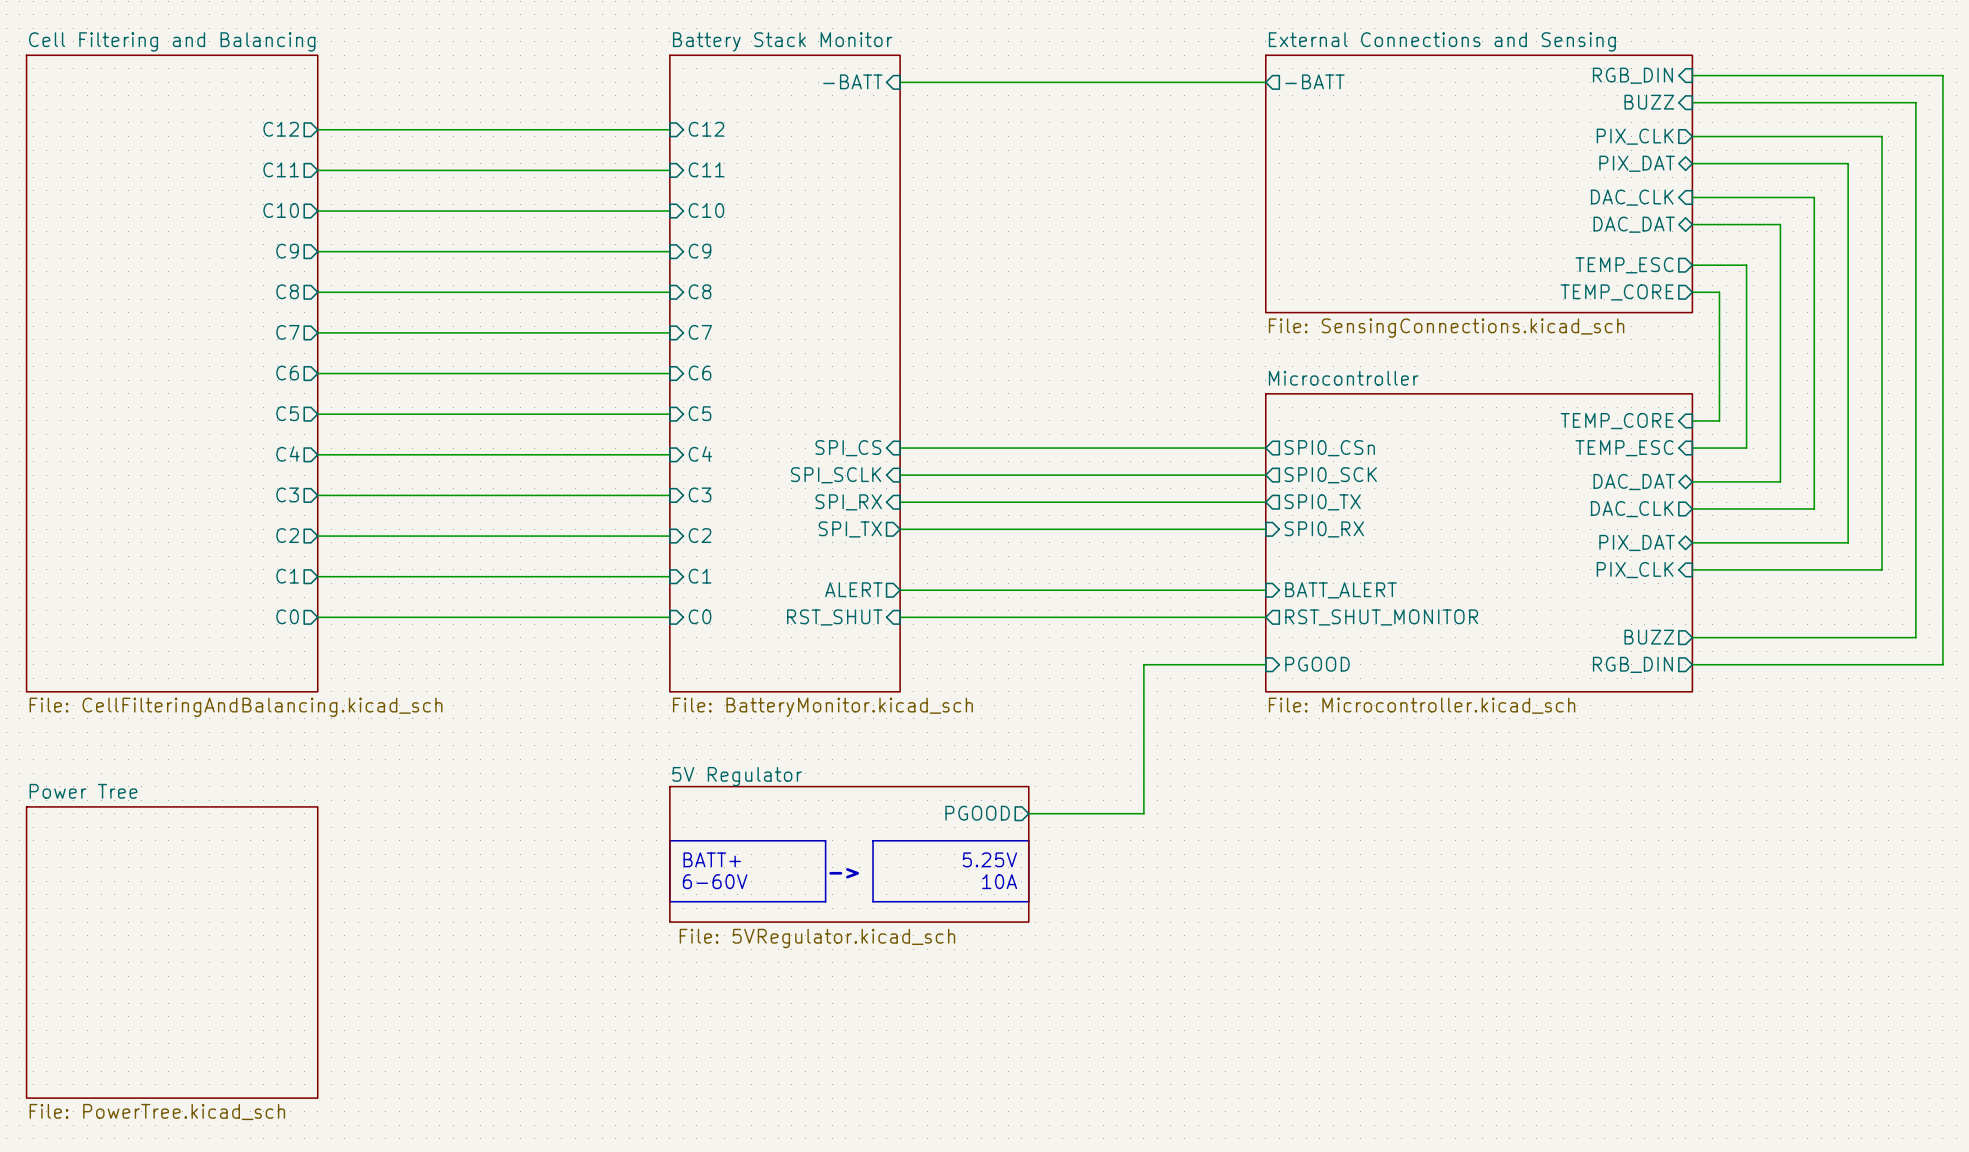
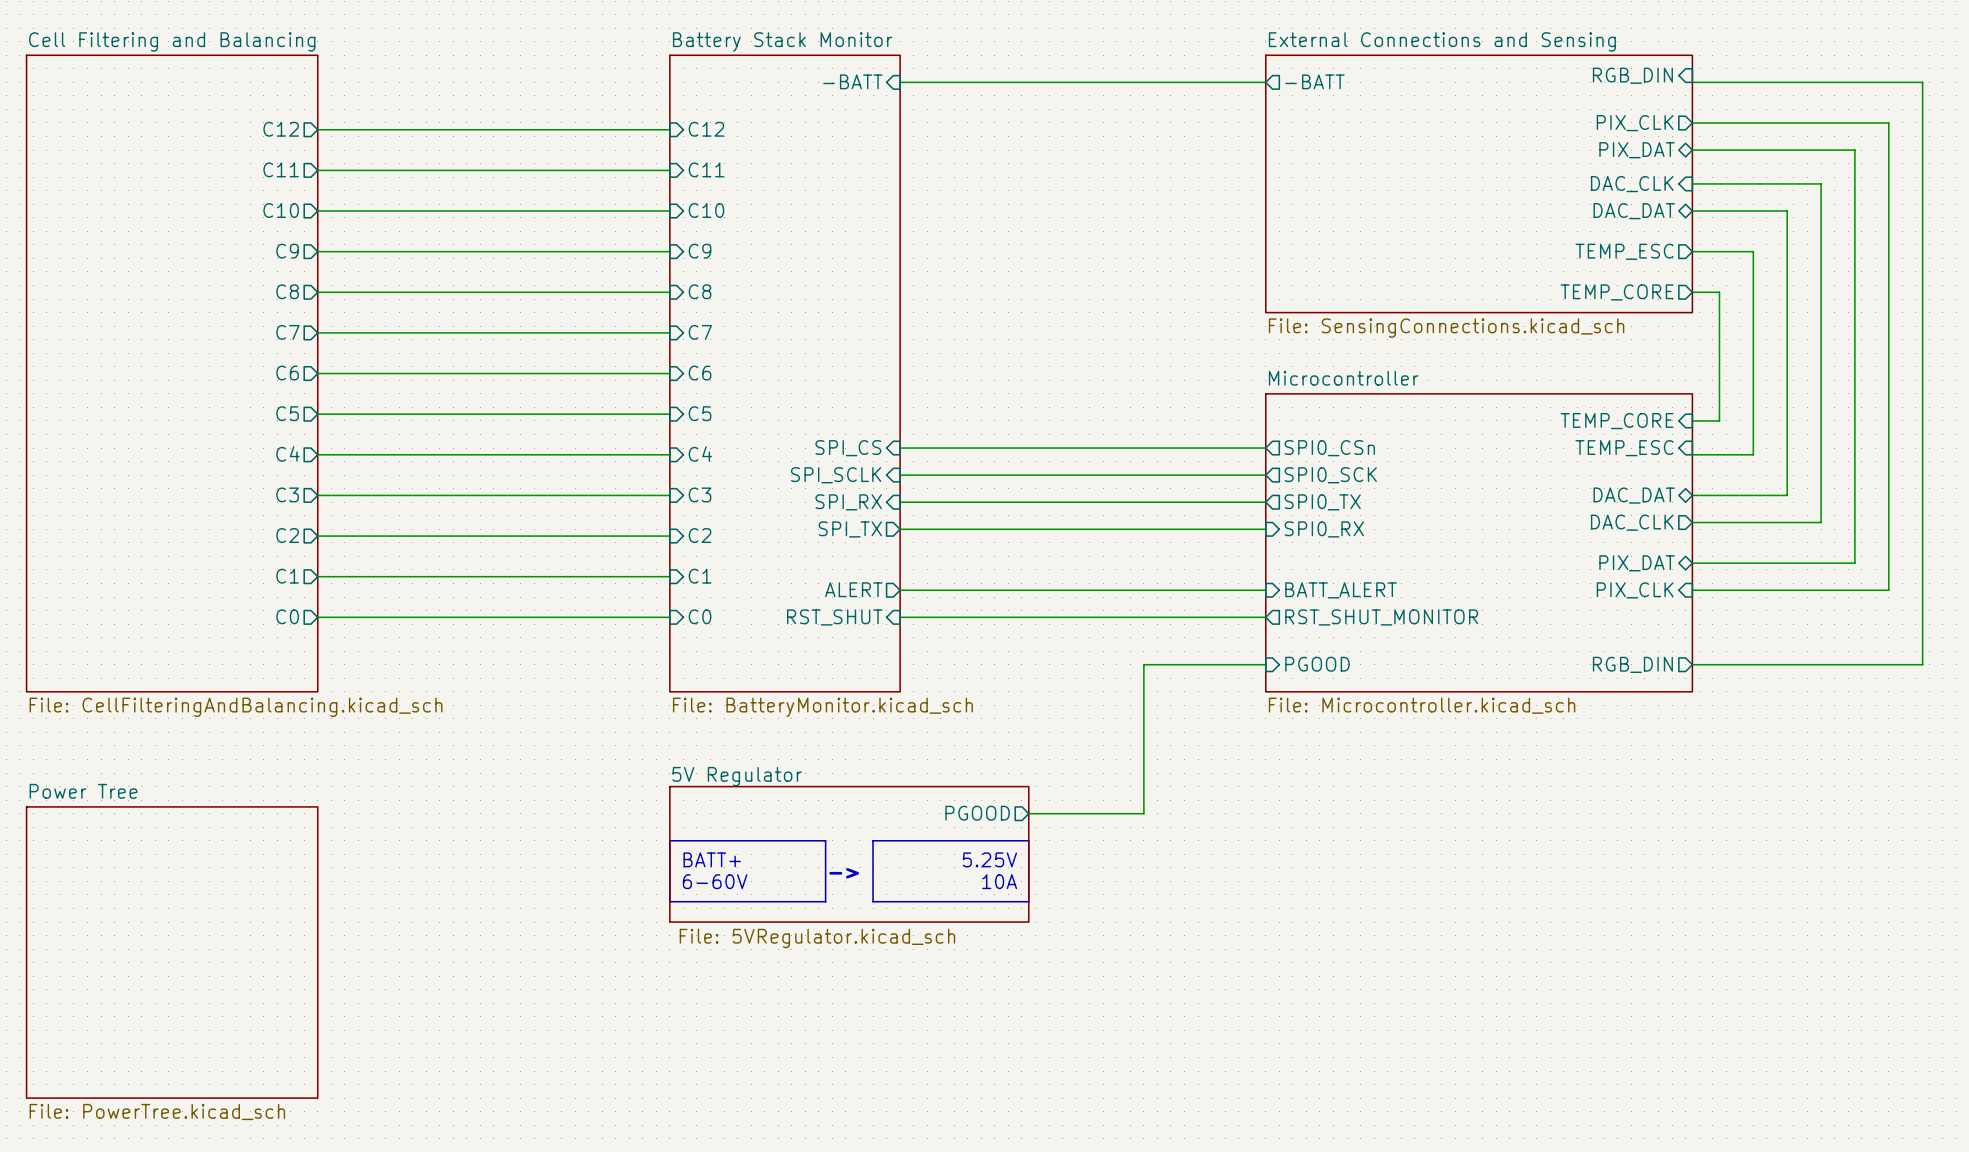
wire: (1692, 75) (1942, 75) (1942, 664) (1922, 664) -> (1692, 82) (1922, 82) (1922, 664)
sheet pin: BUZZ (1649, 102) -> none
wire: (1692, 102) (1915, 102) (1915, 637) (1692, 637) -> none
wire: none -> (1692, 122) (1888, 122) (1888, 590) (1692, 590)
sheet pin position: PIX_CLK (1635, 136) -> PIX_CLK (1635, 123)
wire: (1692, 136) (1882, 136) (1882, 569) (1692, 569) -> none
wire: none -> (1692, 150) (1854, 150) (1854, 563) (1692, 563)
sheet pin position: PIX_DAT (1637, 163) -> PIX_DAT (1637, 150)
wire: (1692, 163) (1848, 163) (1848, 542) (1692, 542) -> none
wire: none -> (1692, 183) (1821, 183) (1821, 522) (1692, 522)
sheet pin position: DAC_CLK (1632, 197) -> DAC_CLK (1632, 184)
wire: (1692, 197) (1814, 197) (1814, 508) (1692, 508) -> none
wire: none -> (1692, 211) (1787, 211) (1787, 495) (1692, 495)
sheet pin position: DAC_DAT (1634, 224) -> DAC_DAT (1634, 211)
wire: (1692, 224) (1780, 224) (1780, 481) (1692, 481) -> none
wire: none -> (1692, 251) (1753, 251) (1753, 454) (1692, 454)
sheet pin position: TEMP_ESC (1624, 265) -> TEMP_ESC (1624, 251)
wire: (1692, 265) (1746, 265) (1746, 448) (1692, 448) -> none
sheet pin position: DAC_DAT (1634, 482) -> DAC_DAT (1634, 495)
sheet pin position: DAC_CLK (1632, 509) -> DAC_CLK (1632, 522)
sheet pin position: PIX_DAT (1637, 542) -> PIX_DAT (1637, 563)
sheet pin position: PIX_CLK (1635, 570) -> PIX_CLK (1635, 590)
sheet pin: BUZZ (1649, 637) -> none

